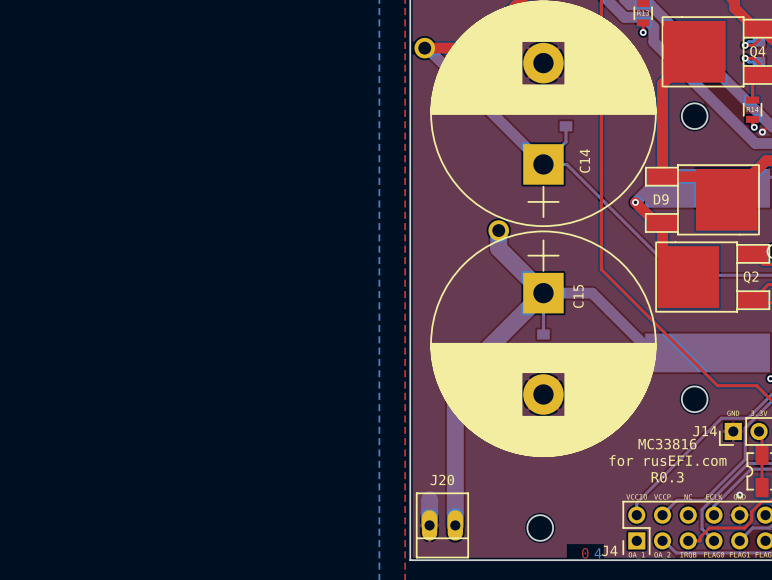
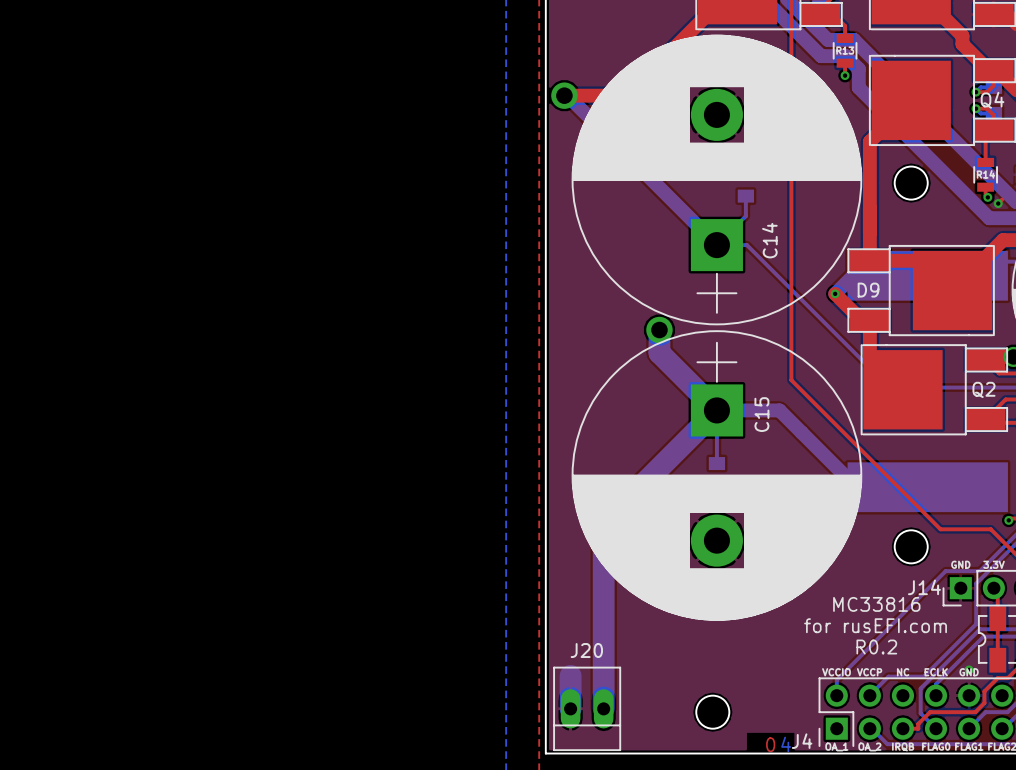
text: R0.3 (667, 477) -> R0.2 (876, 647)

